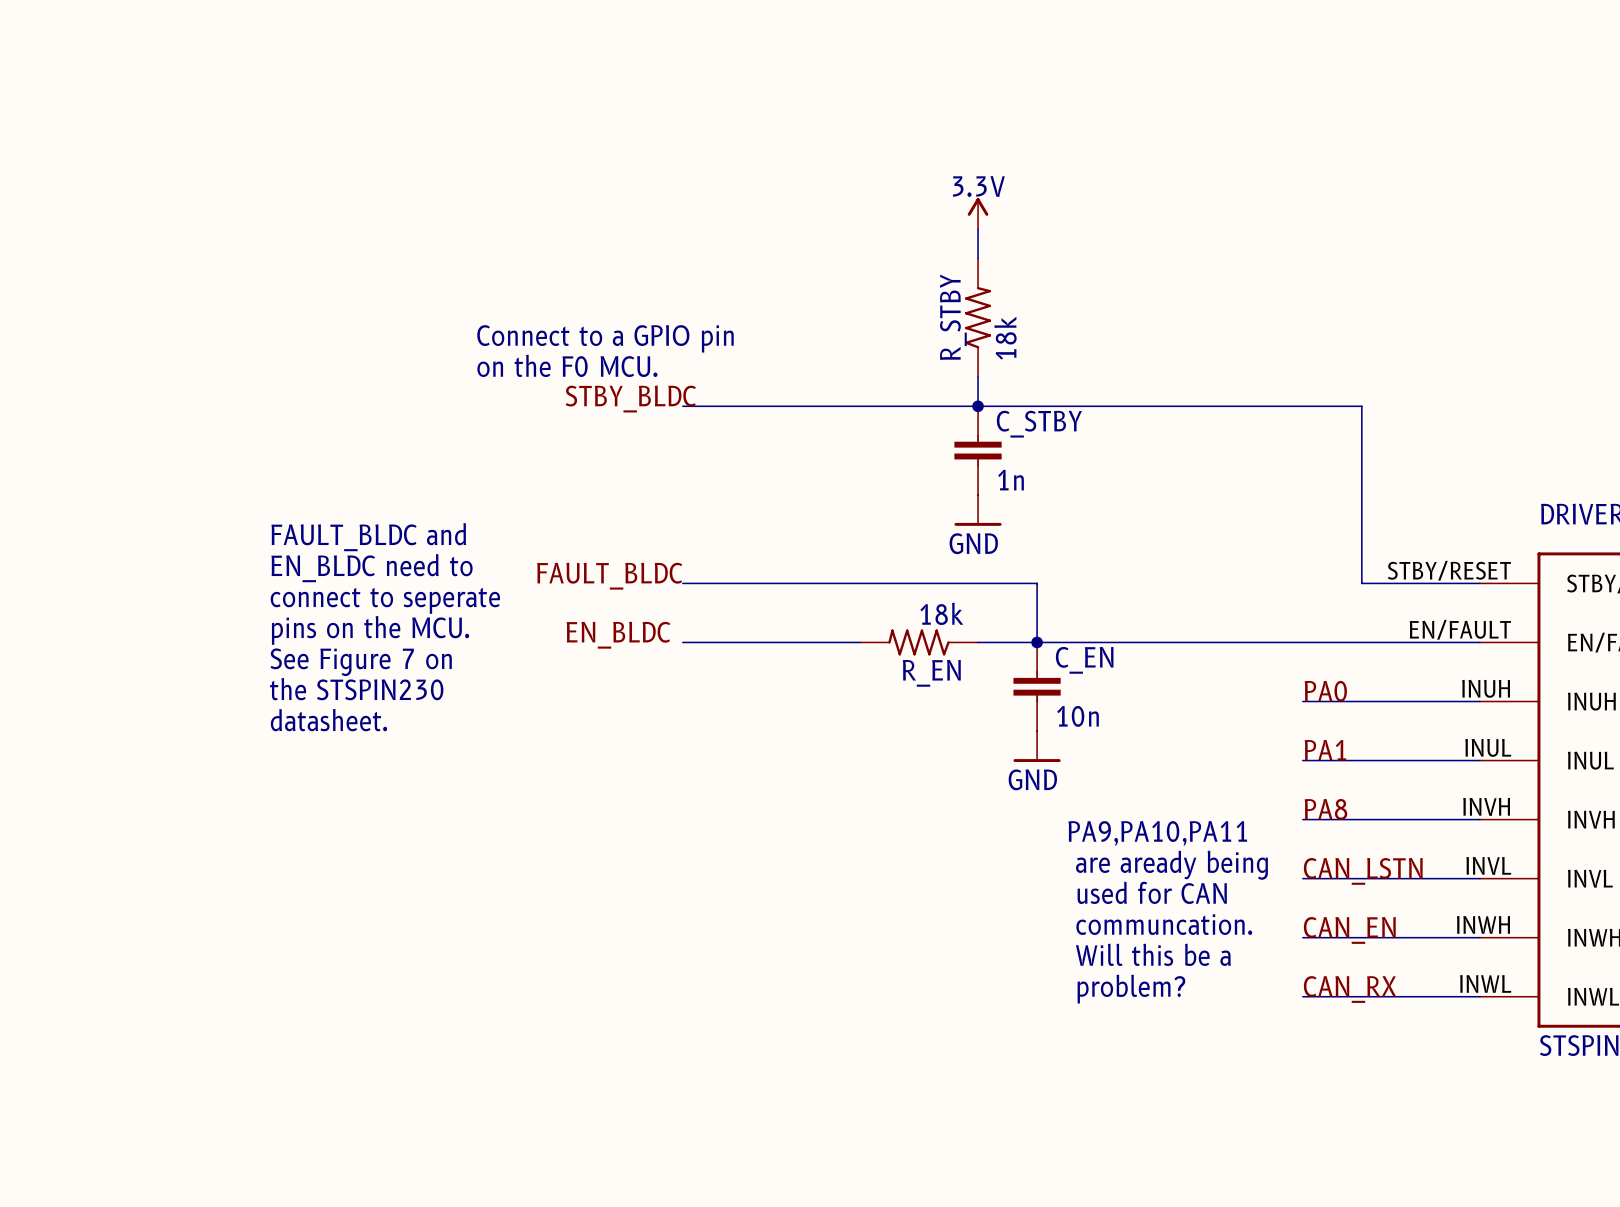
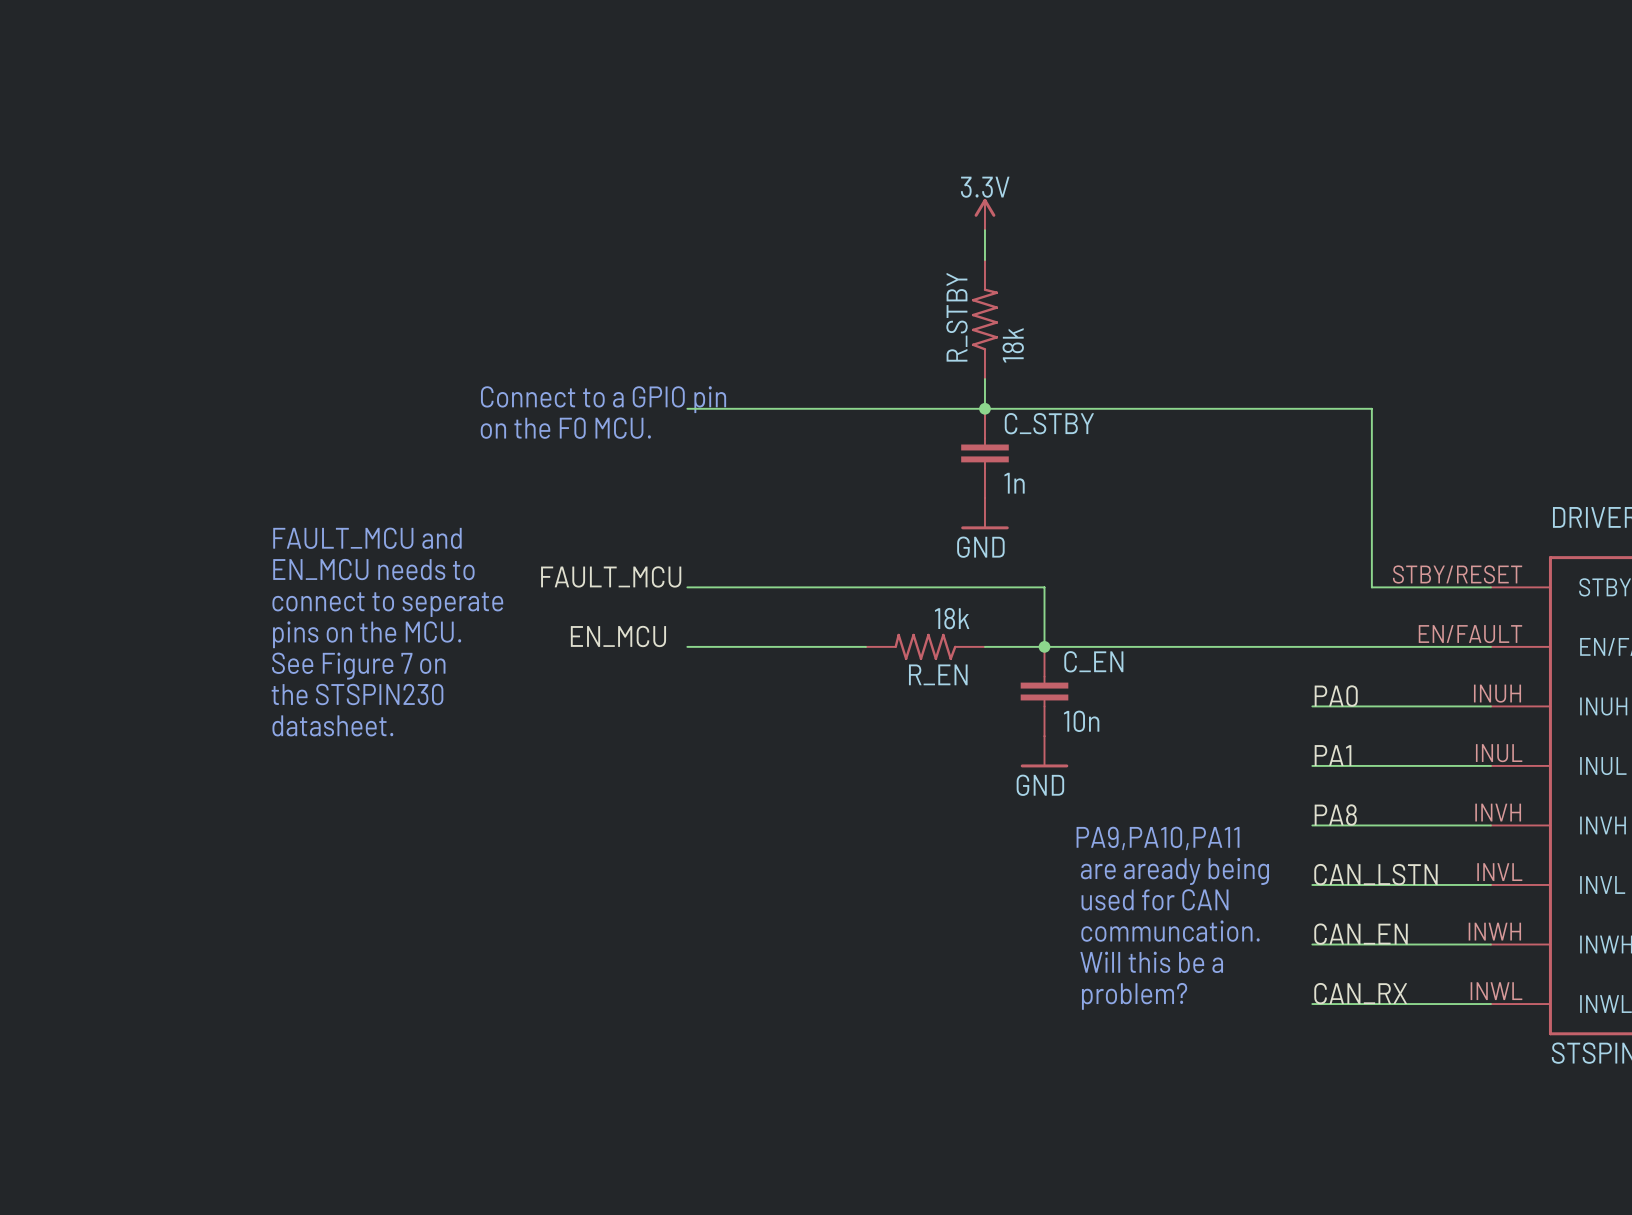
text position: Connect to a GPIO pin (605, 338) -> Connect to a GPIO pin (603, 399)
text position: on the F0 MCU. (567, 365) -> on the F0 MCU. (565, 428)
label: STBY_BLDC (630, 399) -> none
text: FAULT_BLDC and (368, 537) -> FAULT_MCU and (367, 538)
text: EN_BLDC need to (372, 568) -> EN_MCU needs to (373, 569)
label: FAULT_BLDC (609, 576) -> FAULT_MCU (611, 576)
label: EN_BLDC (618, 635) -> EN_MCU (618, 636)

